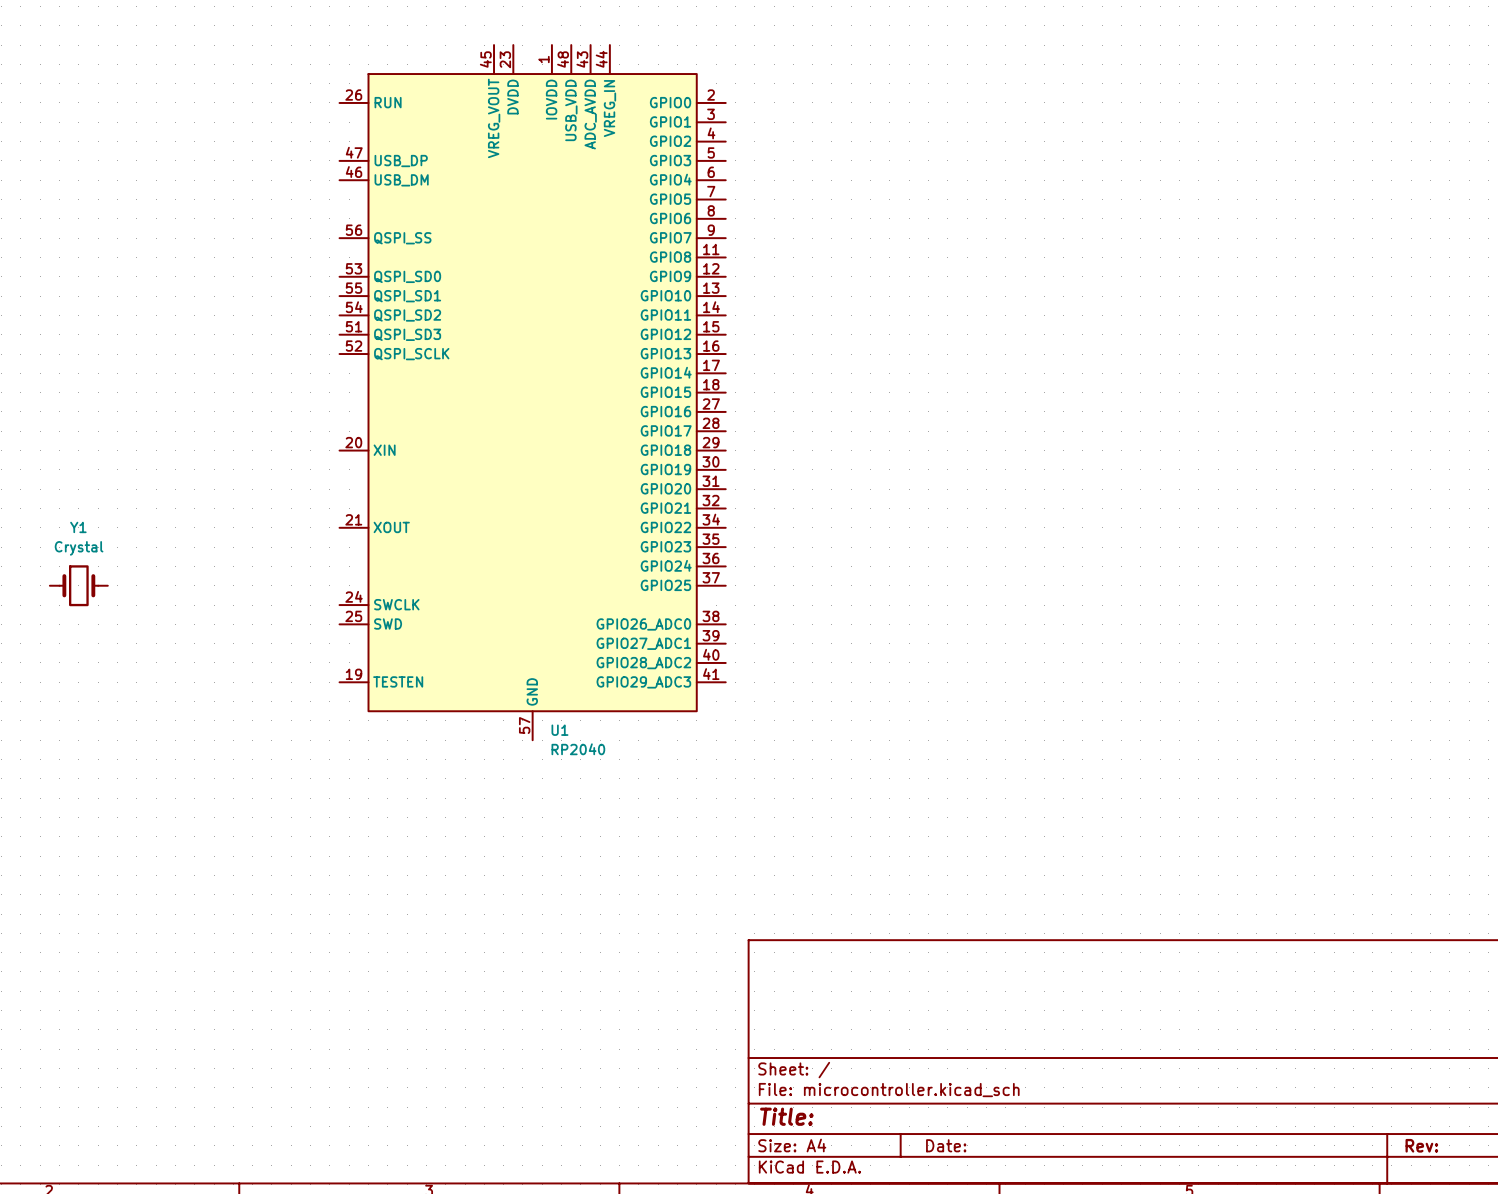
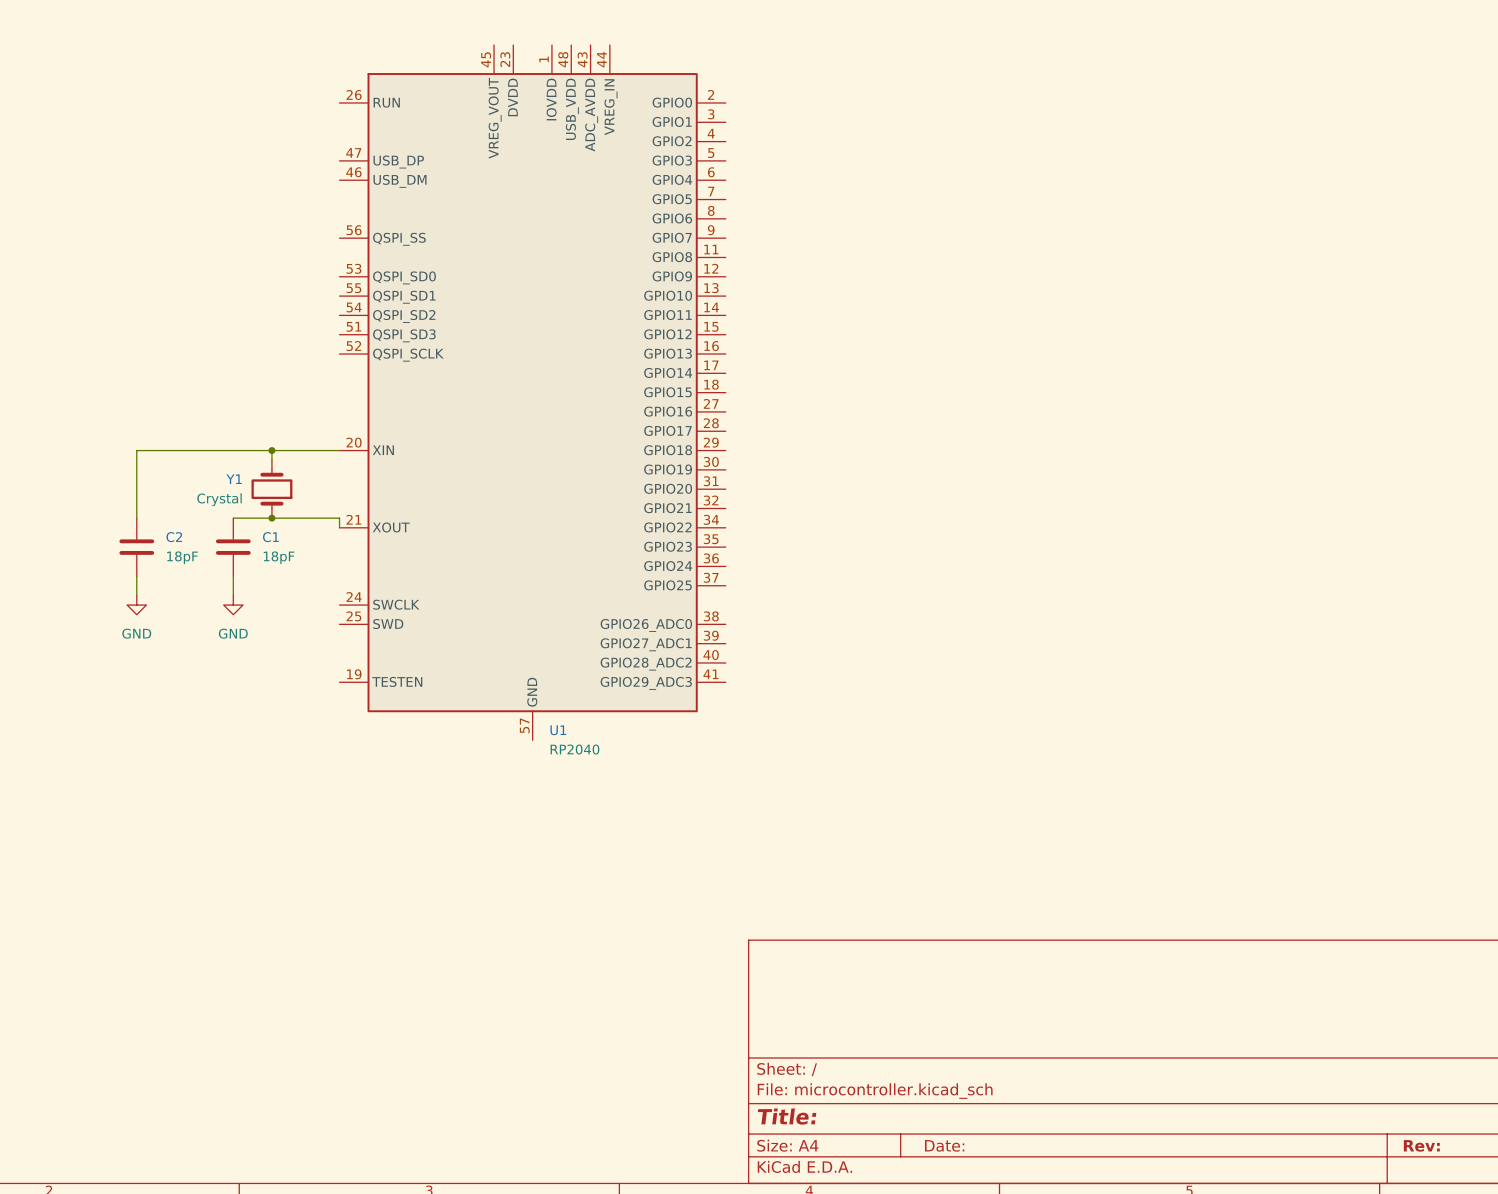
wire: none -> (271, 450) (271, 460)
junction: none -> (271, 450)
wire: none -> (339, 450) (136, 450) (136, 518)
wire: none -> (233, 518) (339, 518) (339, 527)
junction: none -> (271, 518)
Y1 name position: Y1 (78, 527) -> Y1 (234, 479)
C2: none -> 18pF (136, 547)
C1: none -> 18pF (233, 547)
Y1 value position: Crystal (79, 548) -> Crystal (219, 499)
wire: none -> (136, 576) (136, 595)
wire: none -> (233, 576) (233, 595)
Y1 rotation: 0° (78, 585) -> 90° clockwise (271, 489)
Y1 position: (78, 585) -> (271, 489)
power symbol: none -> GND (136, 605)
power symbol: none -> GND (233, 605)

